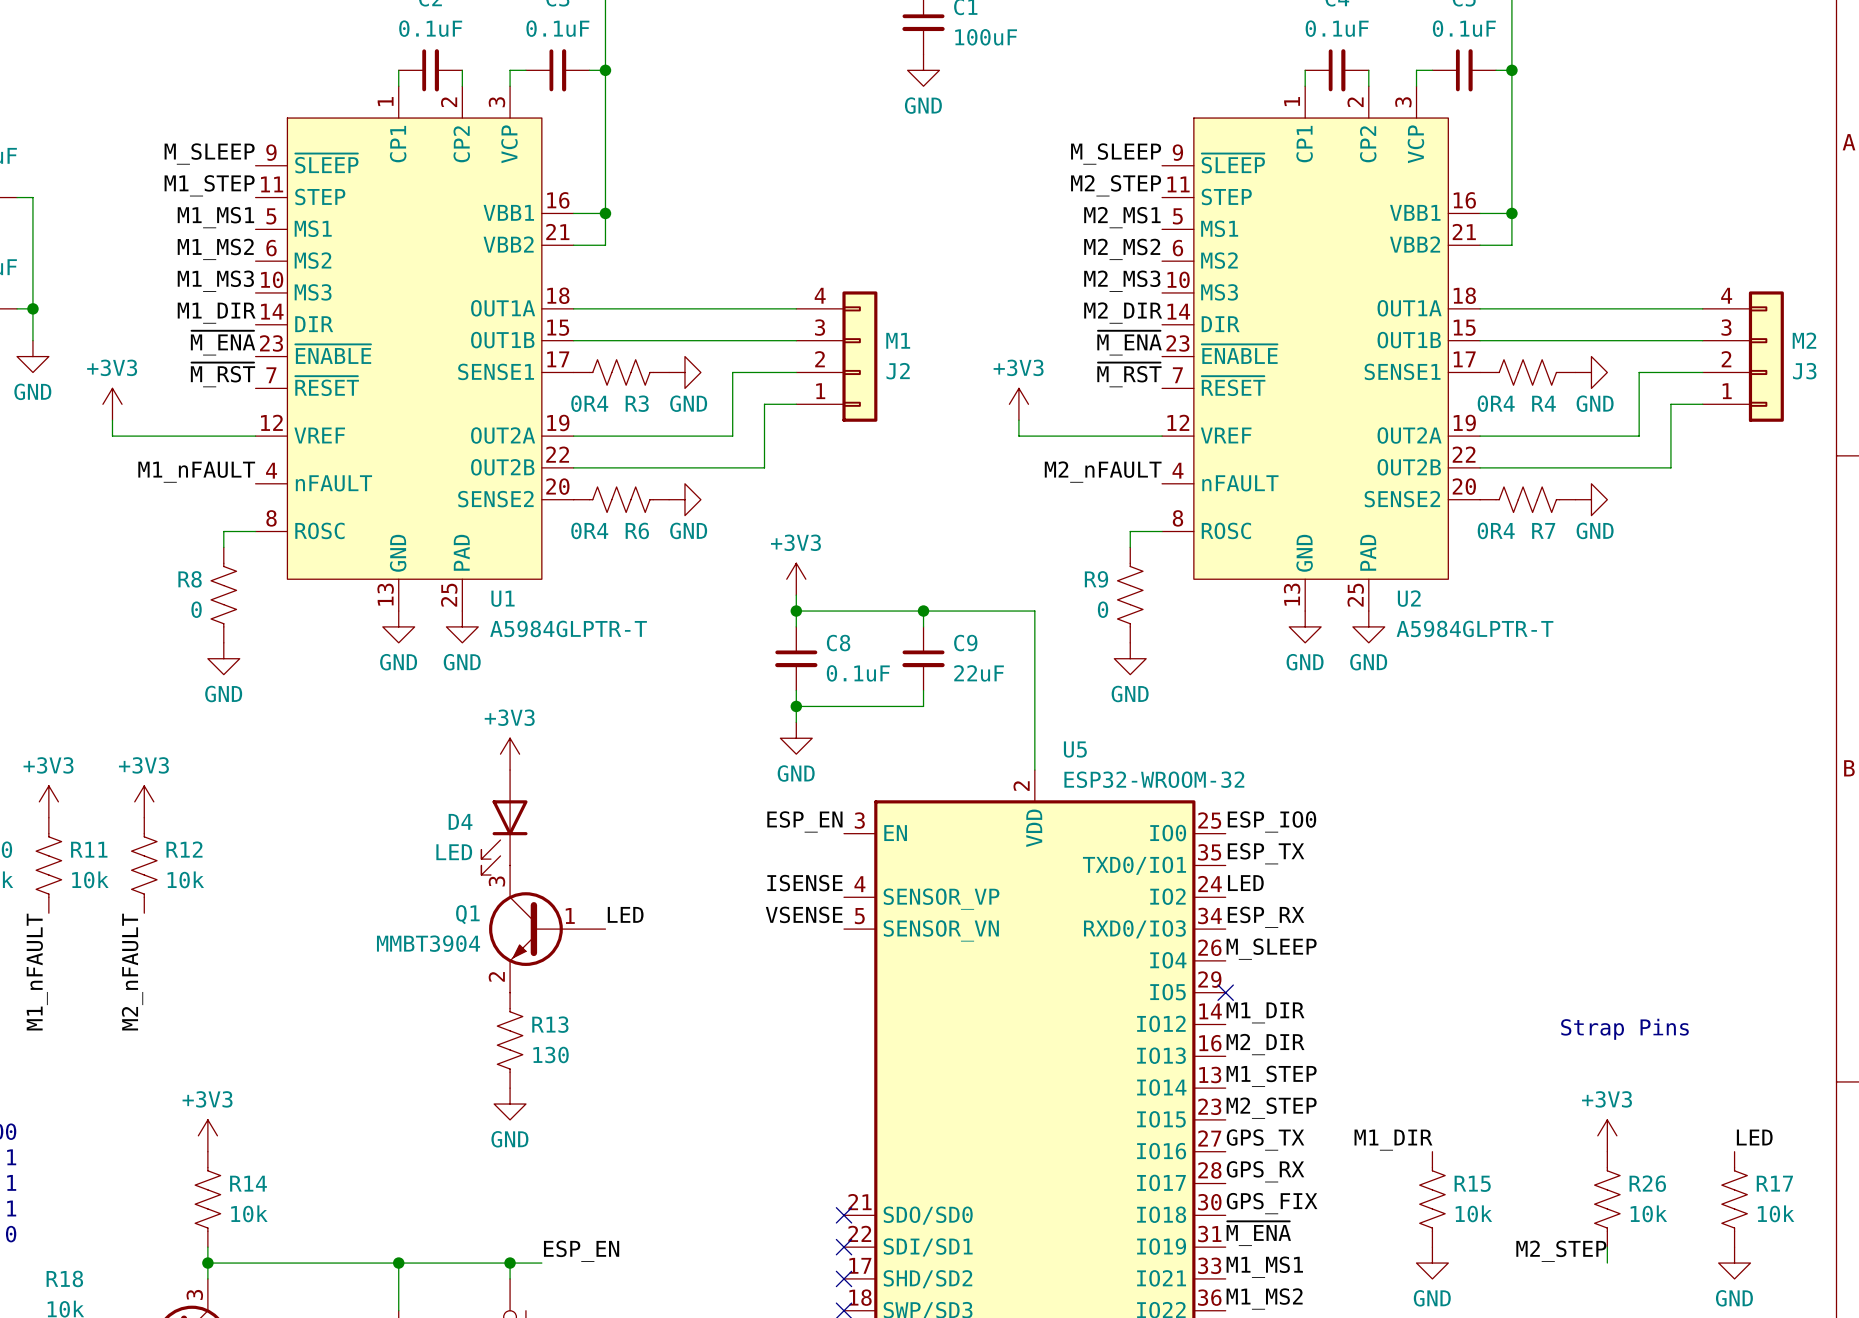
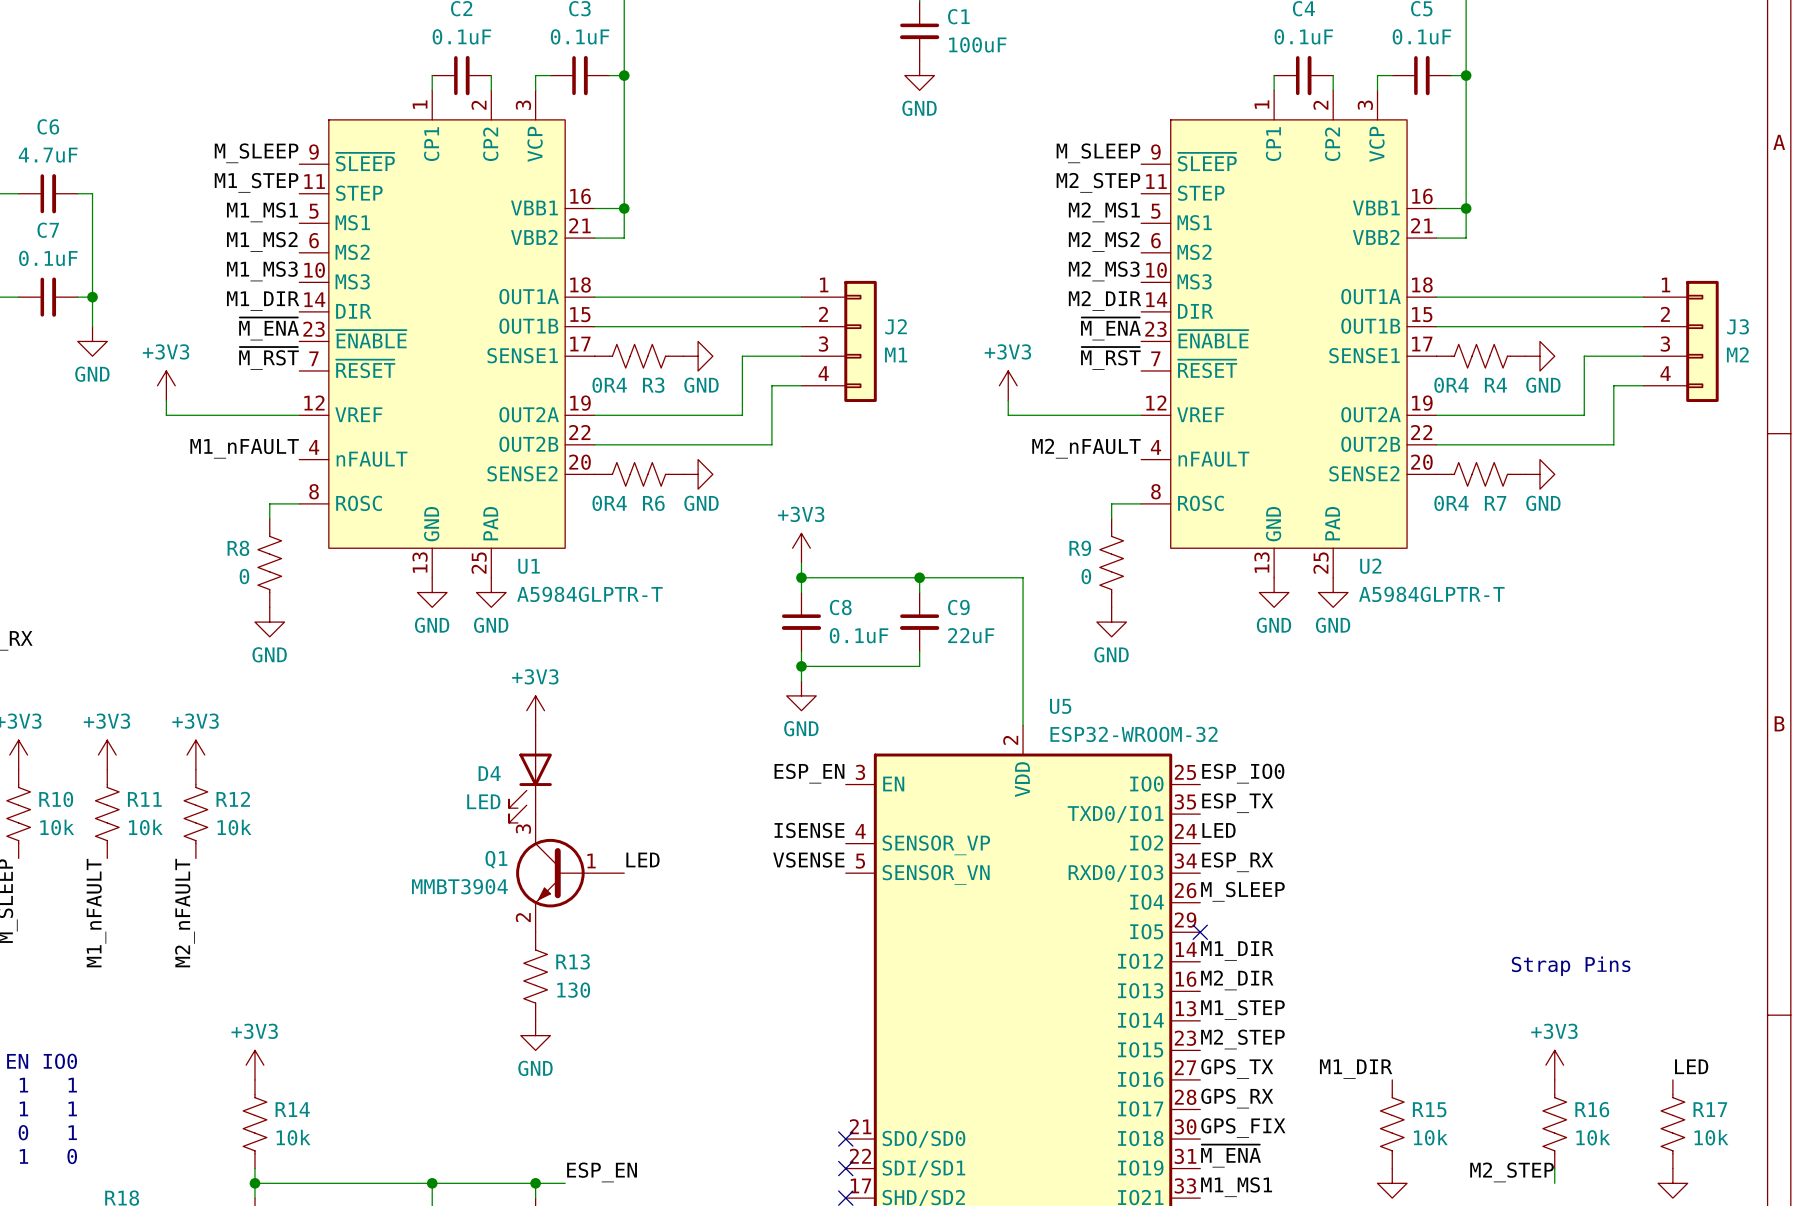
J2 flip: as is (859, 356) -> up-down (860, 341)
J3 flip: as is (1766, 356) -> up-down (1702, 341)
R26 name: R26 (1647, 1183) -> R16 (1592, 1109)

